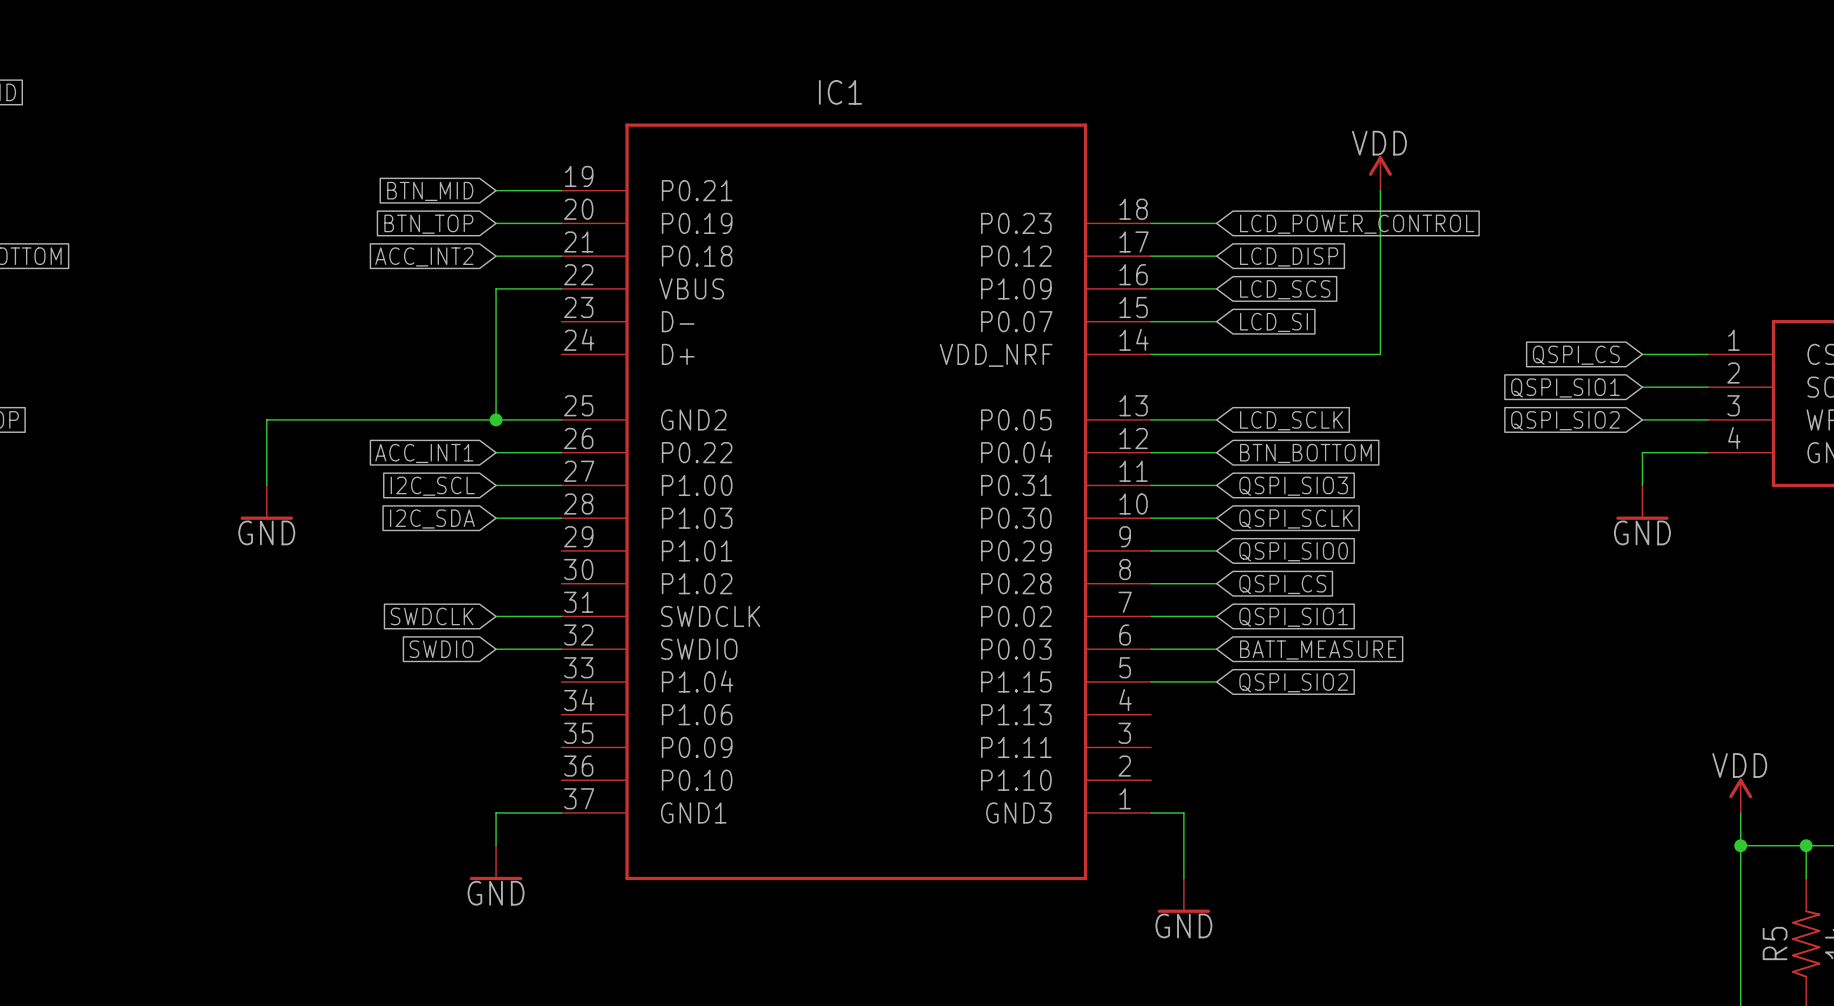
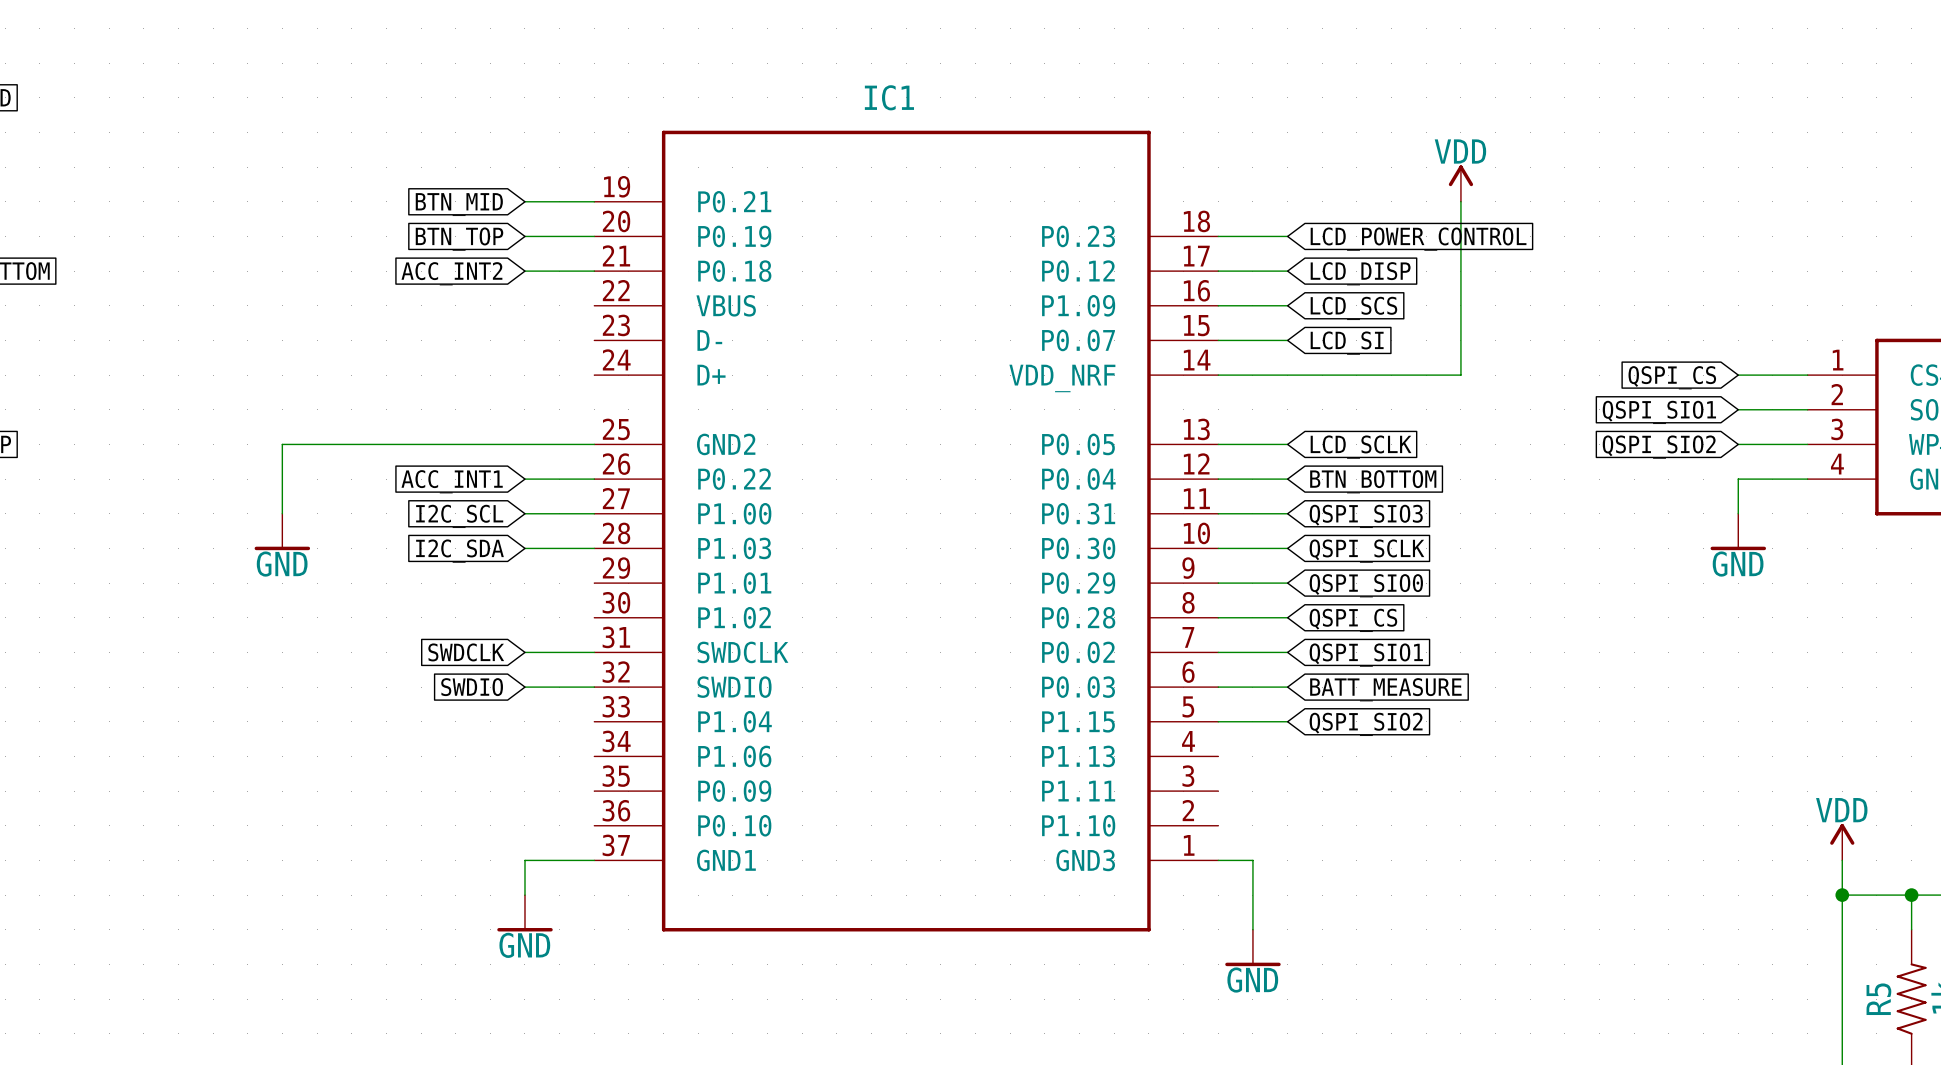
wire: (561, 288) (496, 288) (496, 419) -> none
junction: (496, 419) -> none

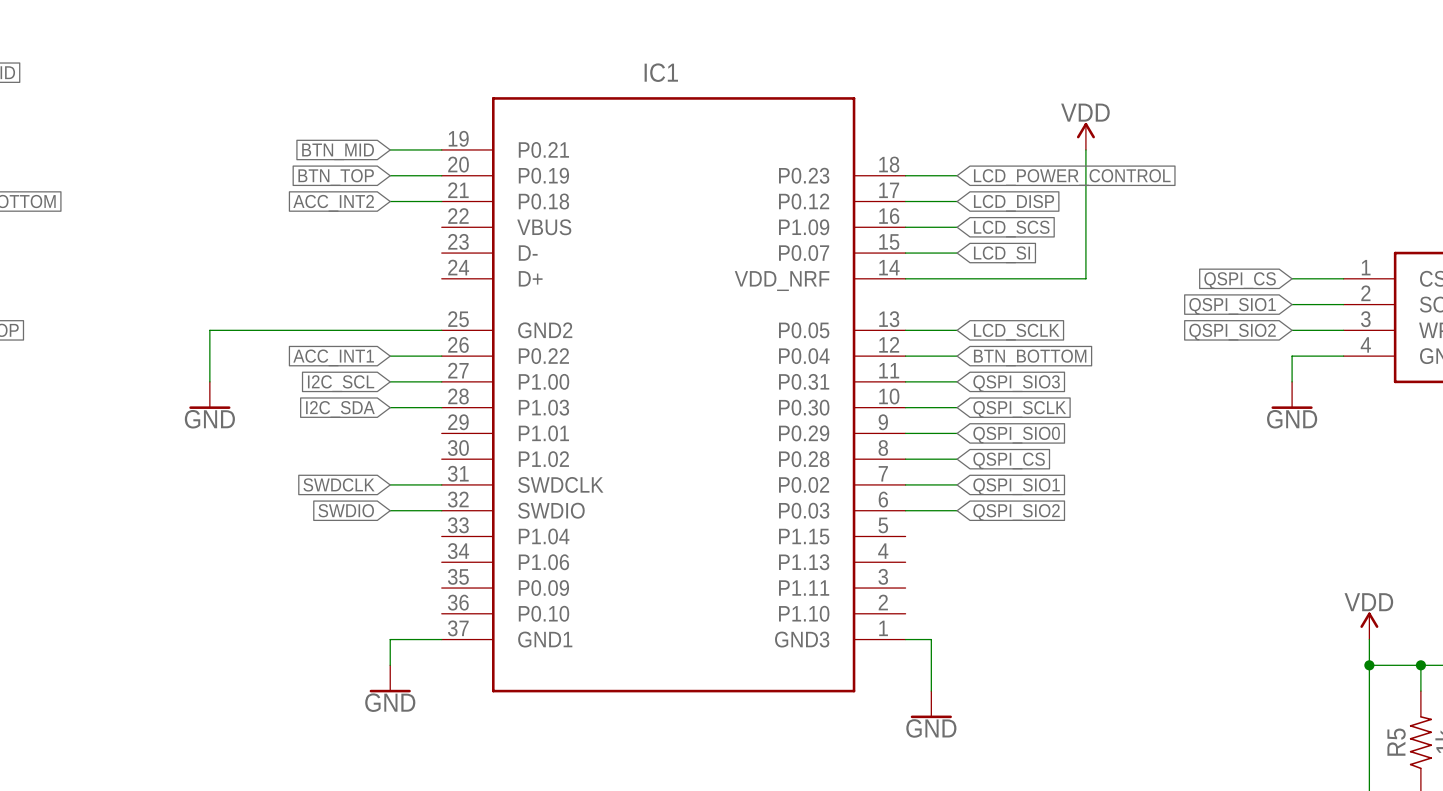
global label: BATT_MEASURE (1385, 689) -> QSPI_SIO2 (1016, 512)
wire: (1218, 721) (1287, 721) -> none
global label: QSPI_SIO2 (1366, 724) -> none

